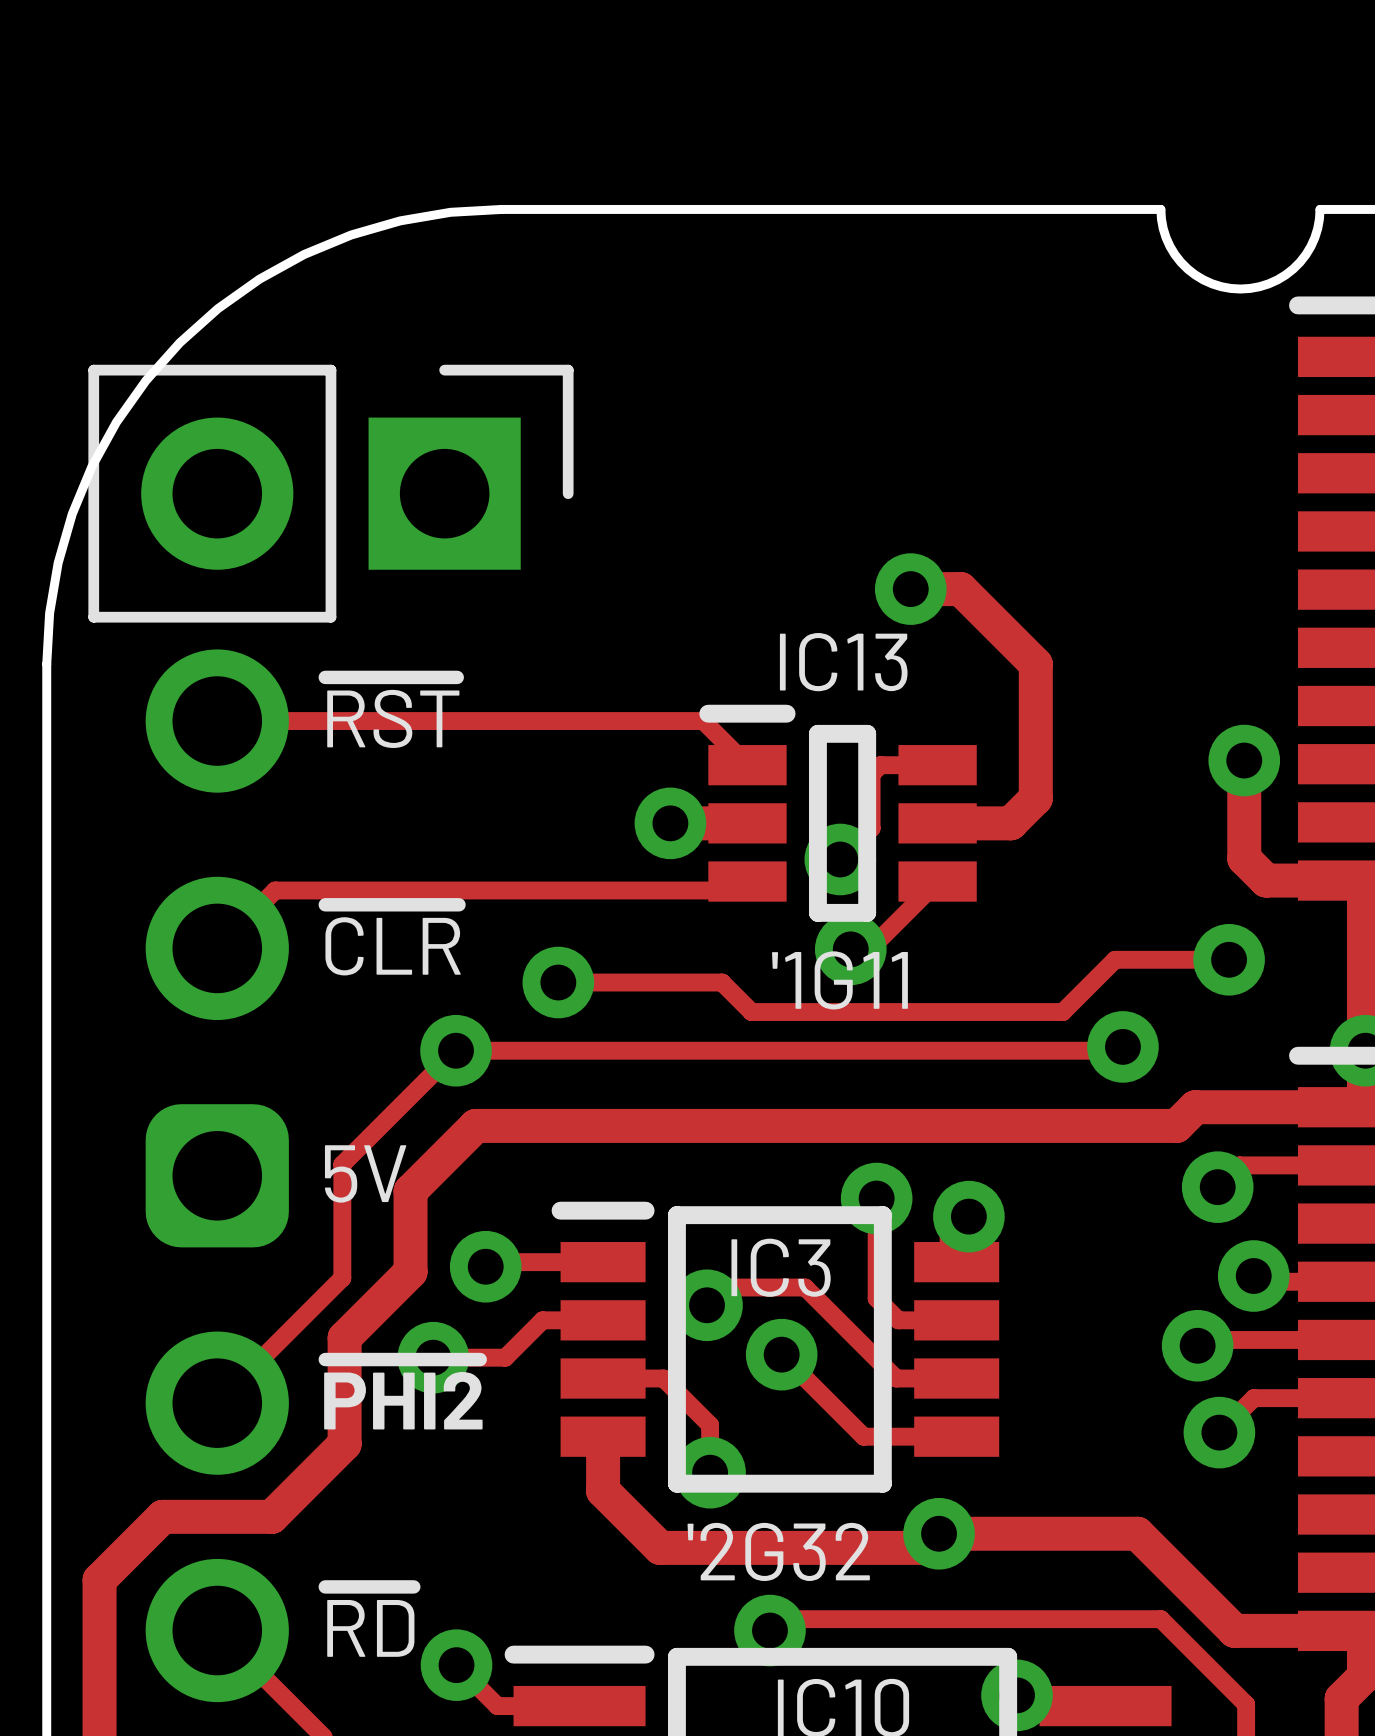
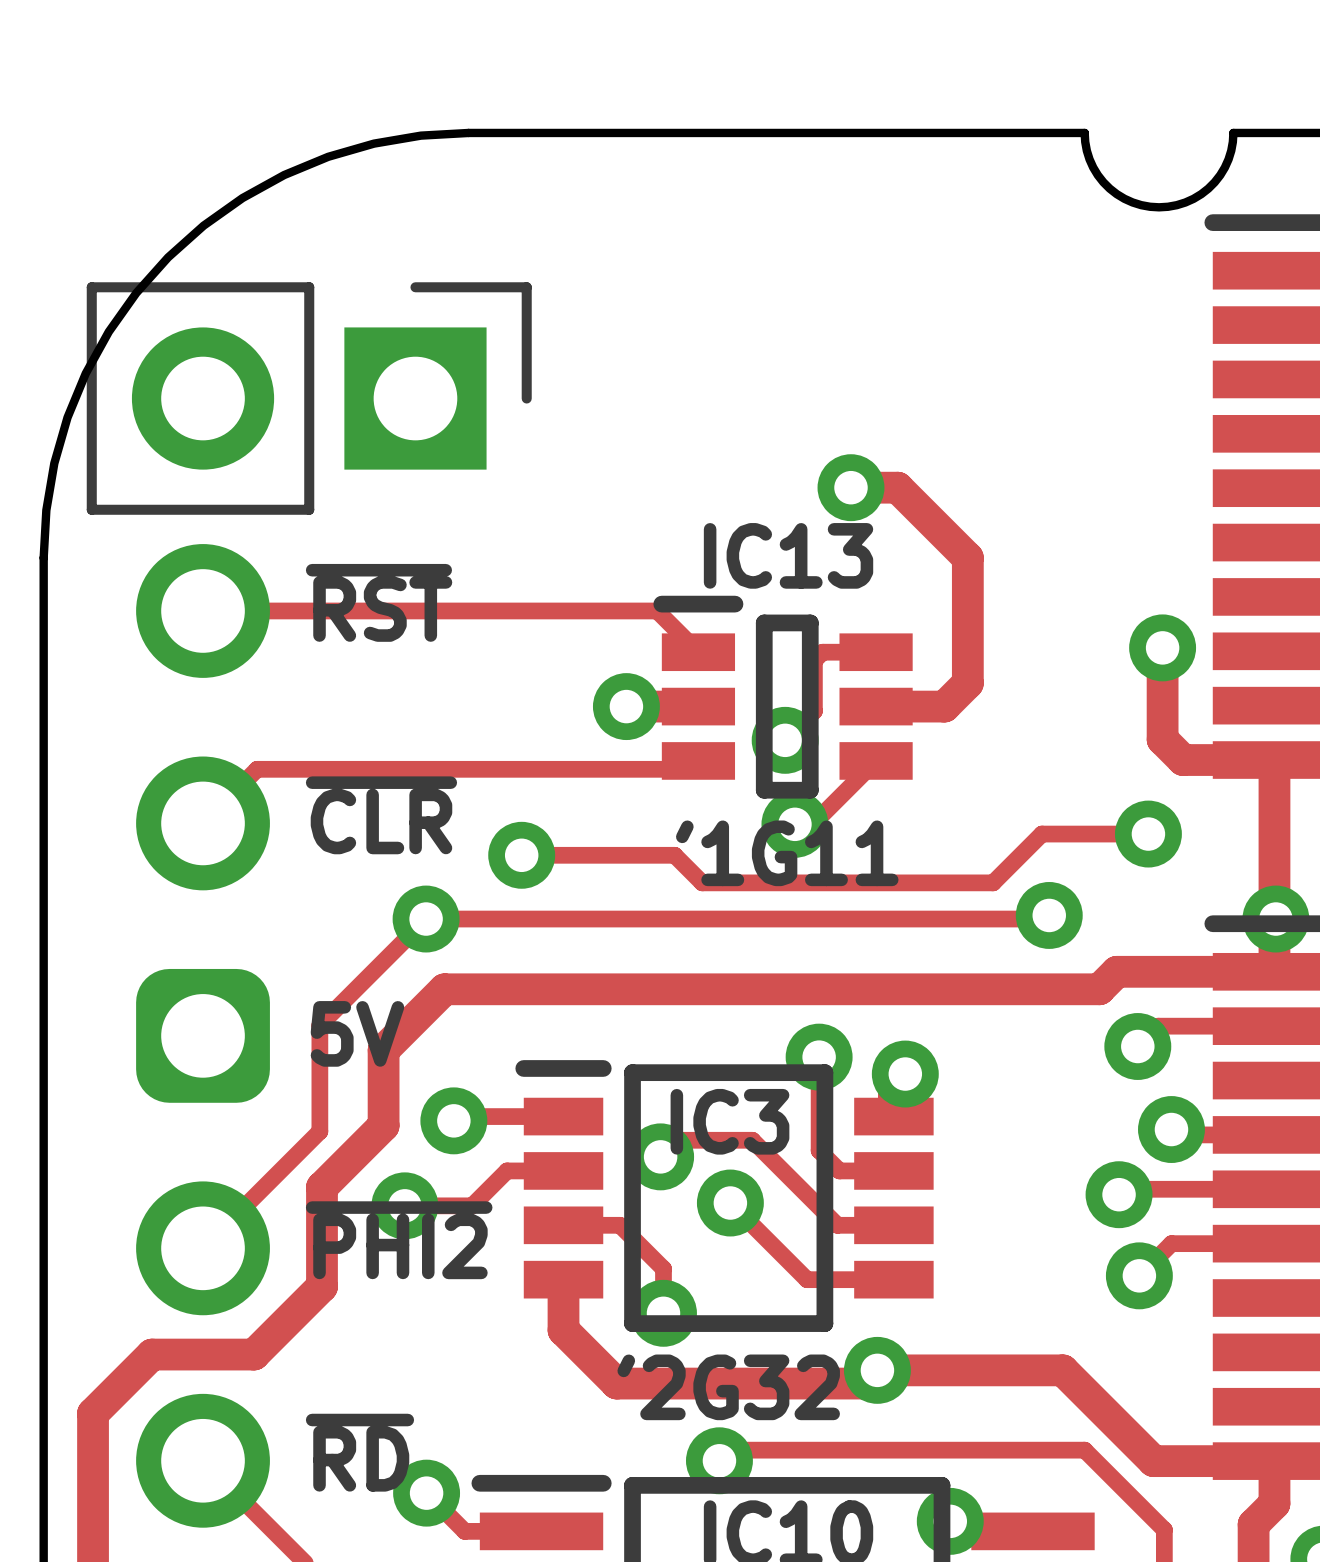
part footprint: [88, 364, 574, 623] -> [86, 282, 532, 515]

